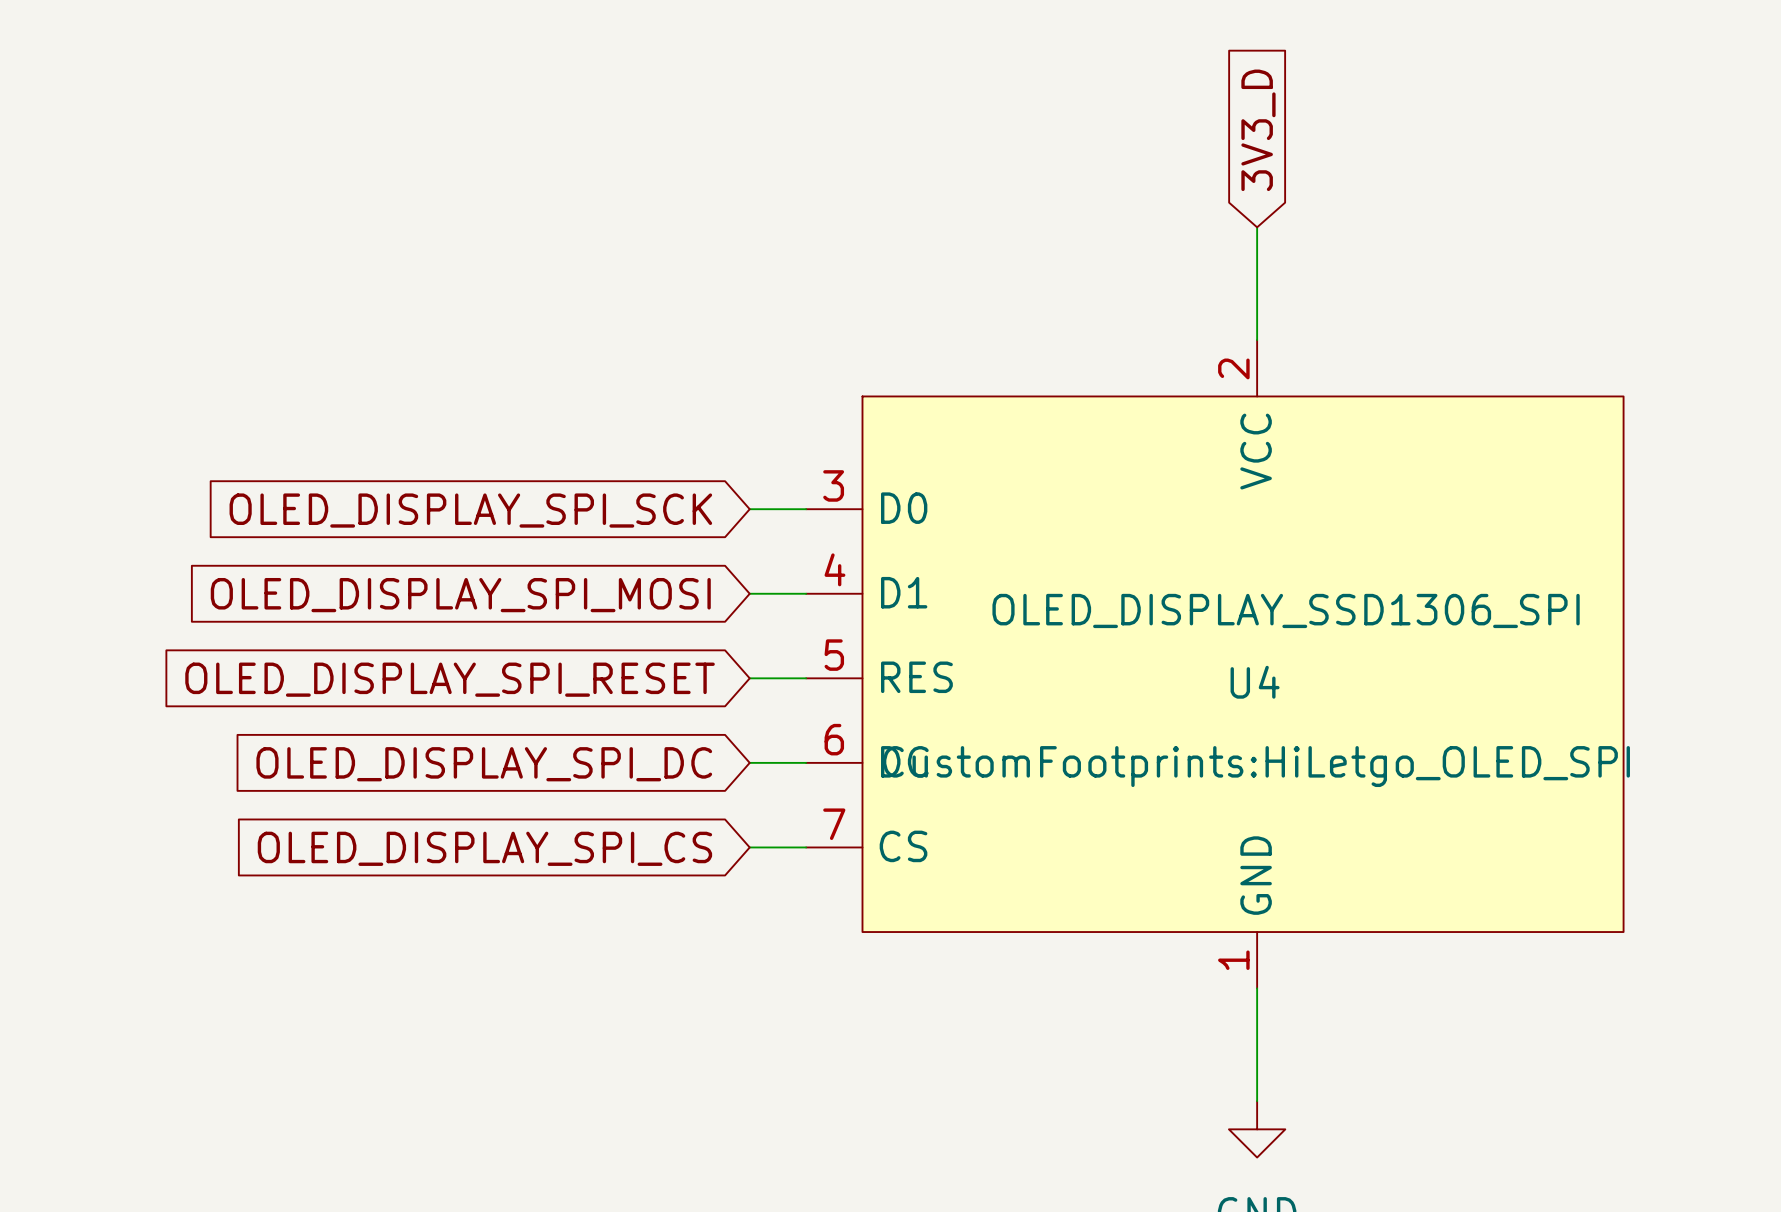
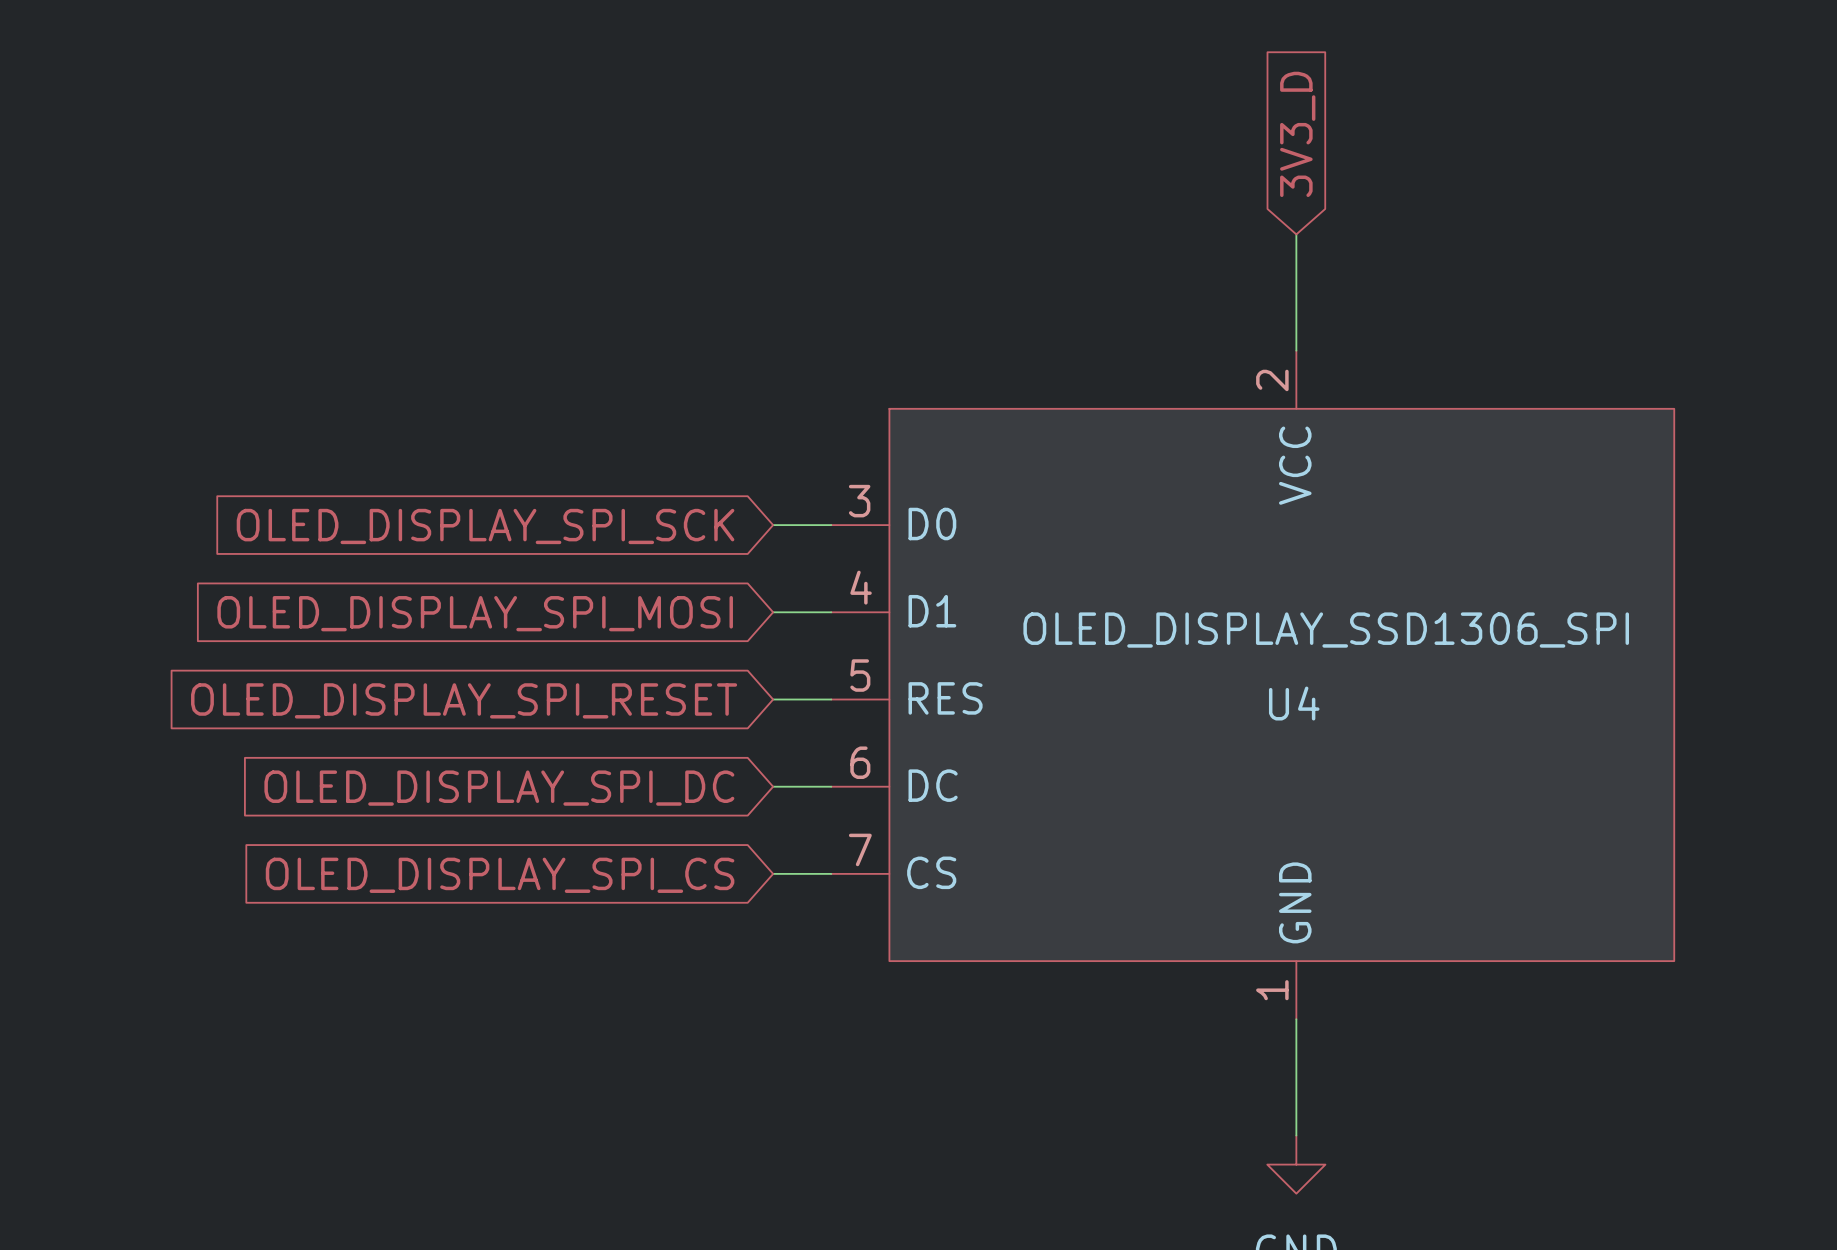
U4 text: CustomFootprints:HiLetgo_OLED_SPI (1256, 766) -> none

